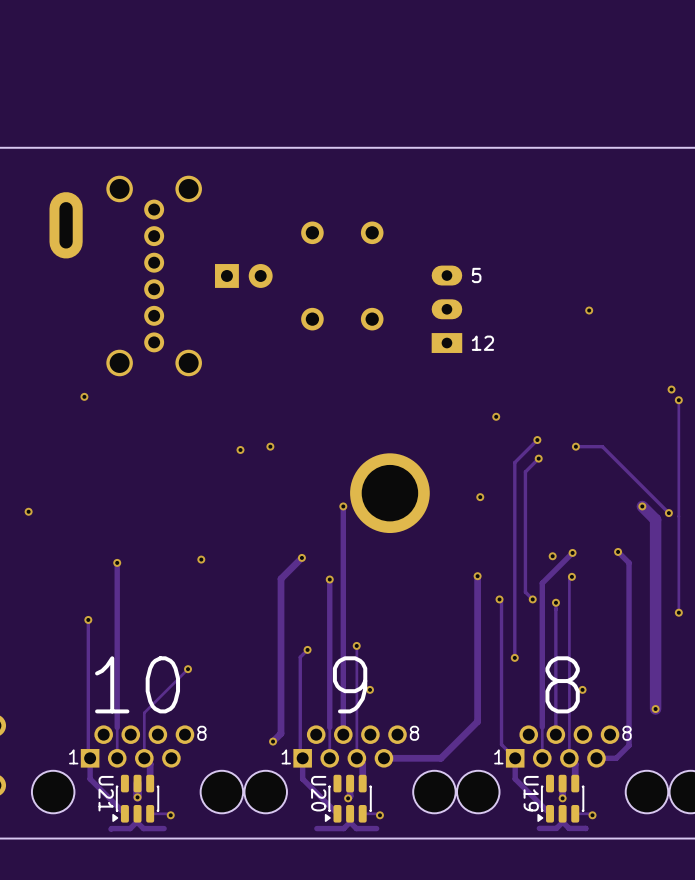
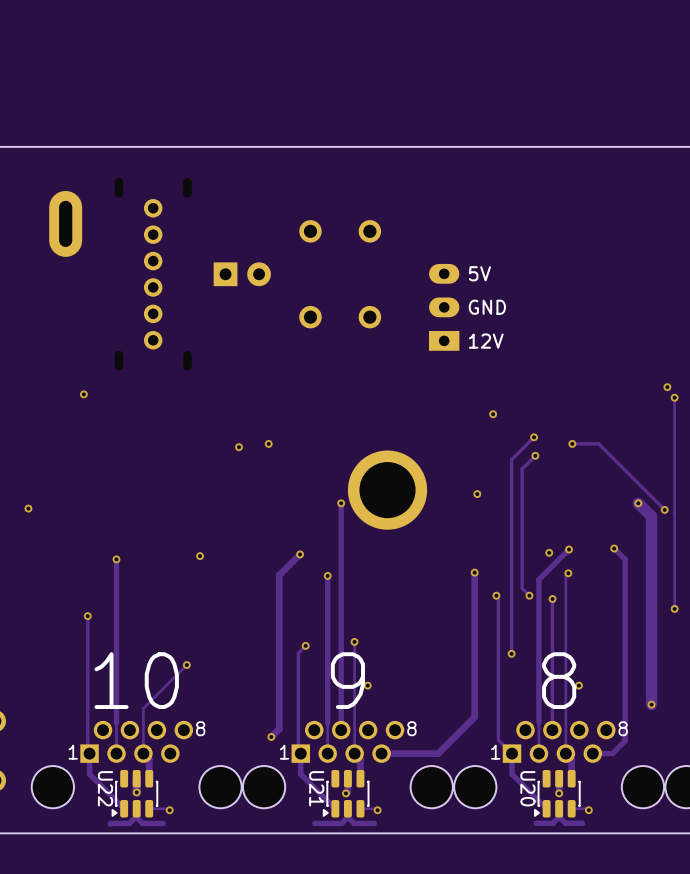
part footprint: [106, 175, 202, 377] -> [114, 177, 192, 371]
text: 5 (476, 275) -> 5V (479, 273)
text: none -> GND (487, 307)
via: (589, 310) -> none
text: 12 (482, 343) -> 12V (486, 341)
U21 name: U21 (106, 793) -> U22 (105, 788)
U20 name: U20 (318, 793) -> U21 (316, 788)
U19 name: U19 (531, 793) -> U20 (527, 788)

